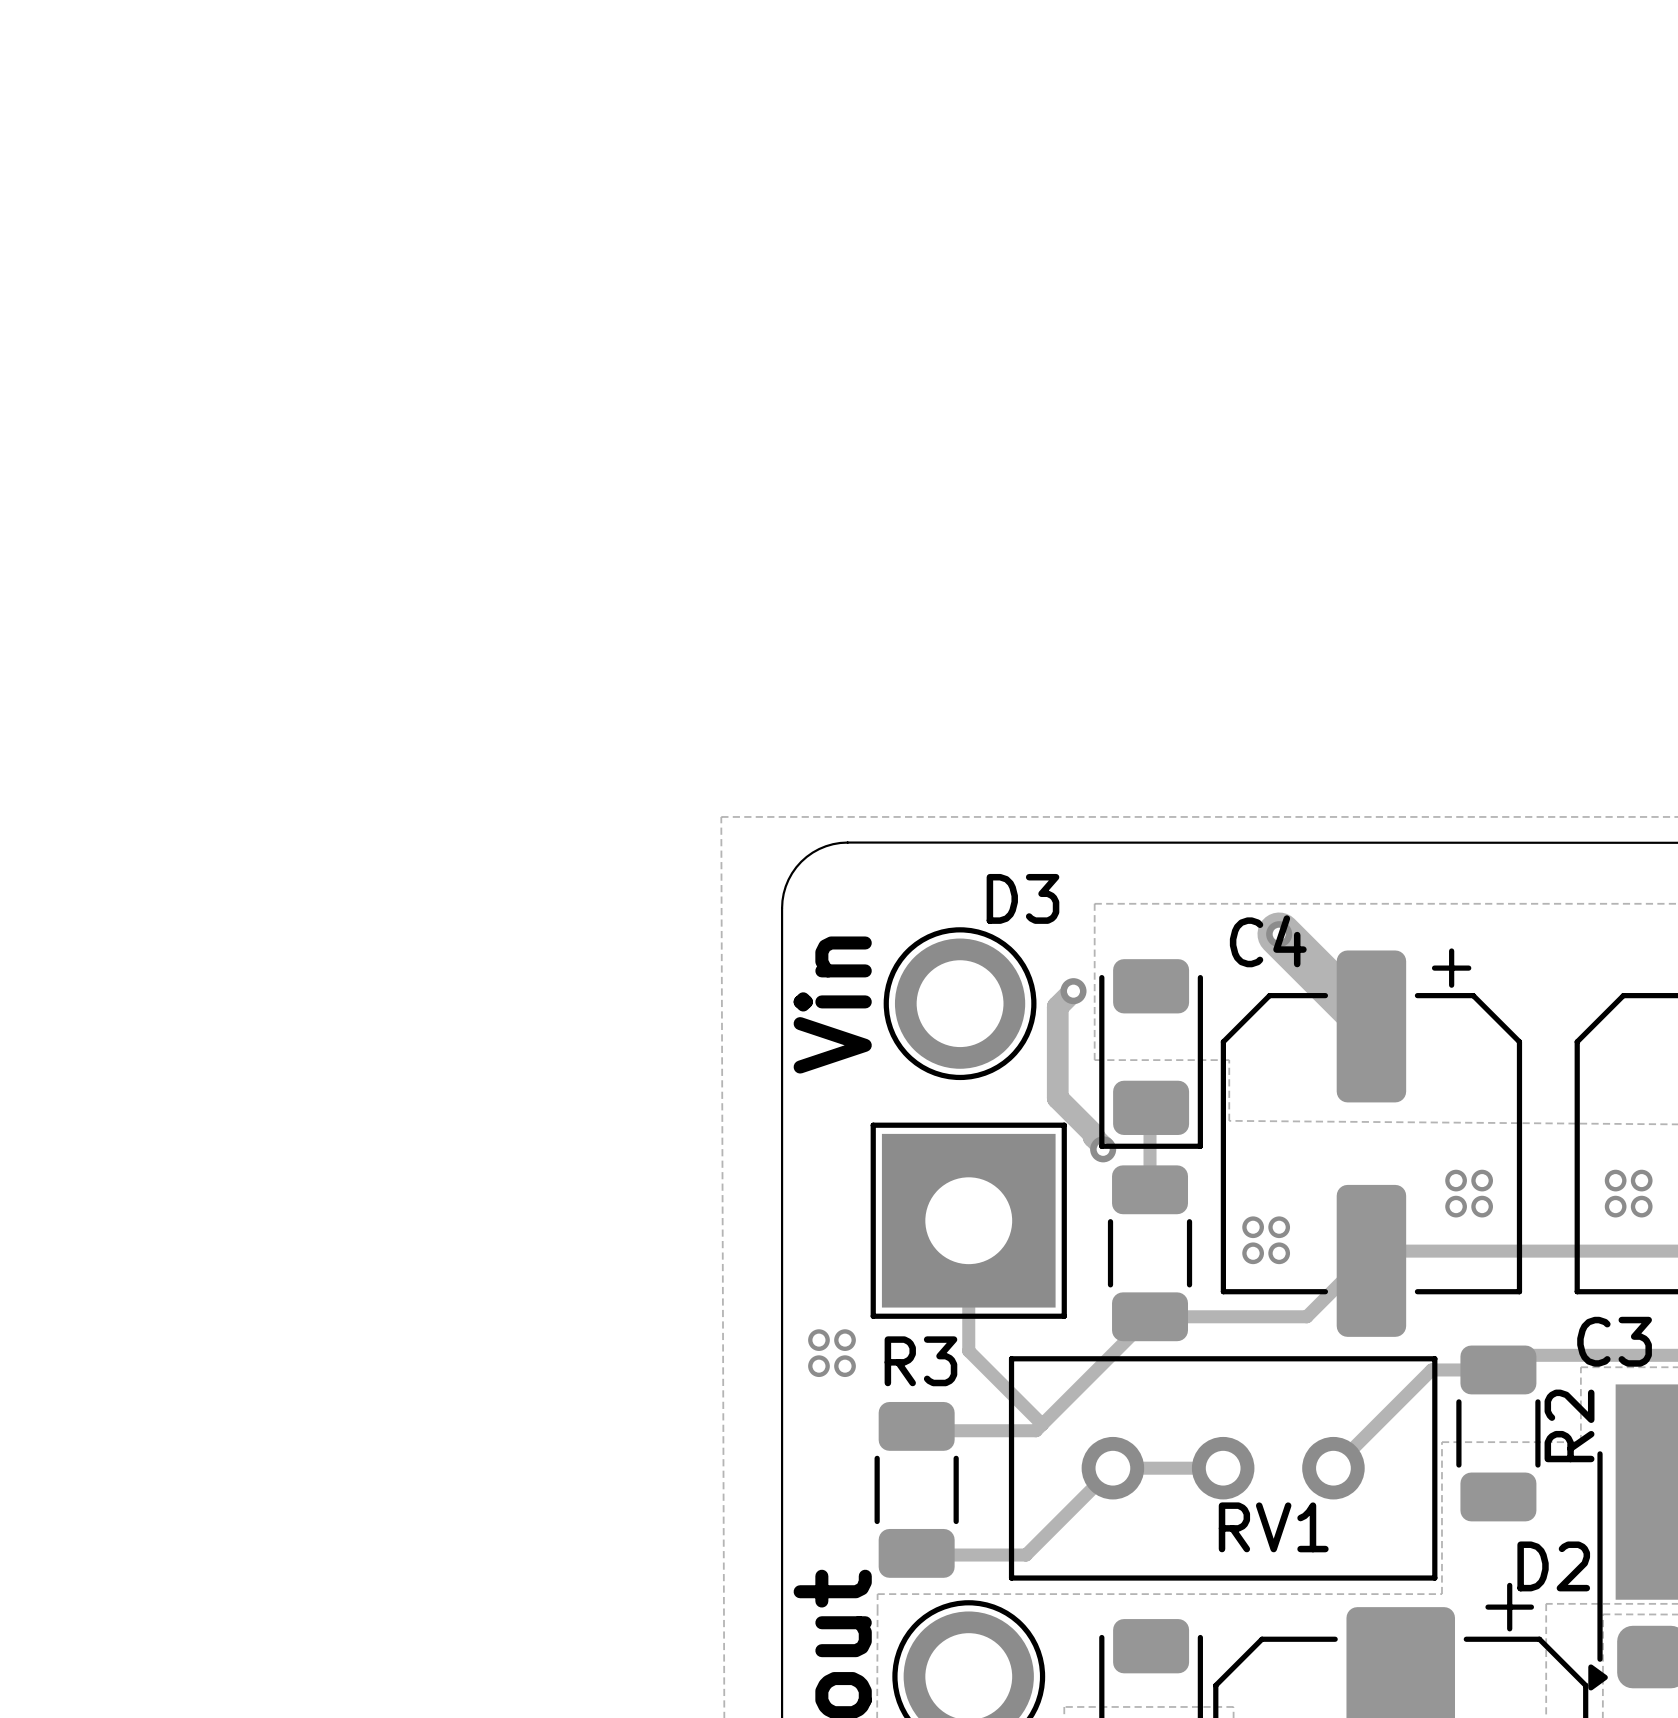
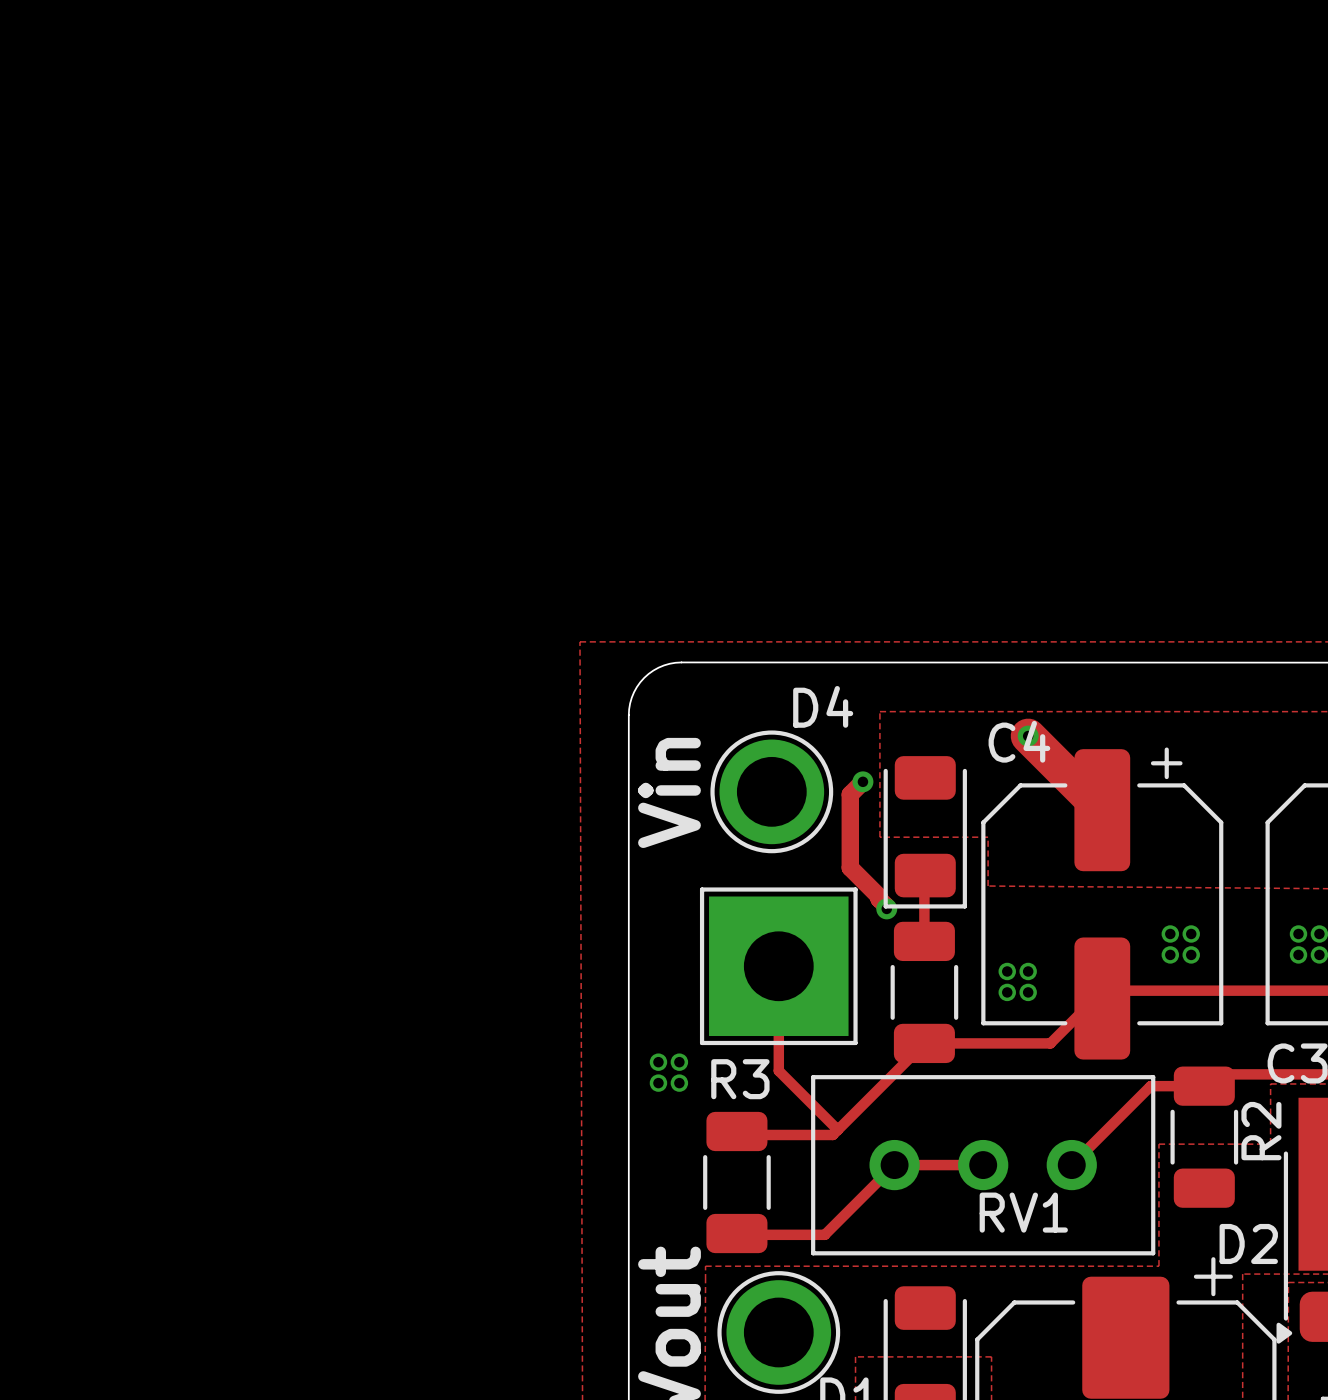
D3 name: D3 (1022, 898) -> D4 (823, 706)

